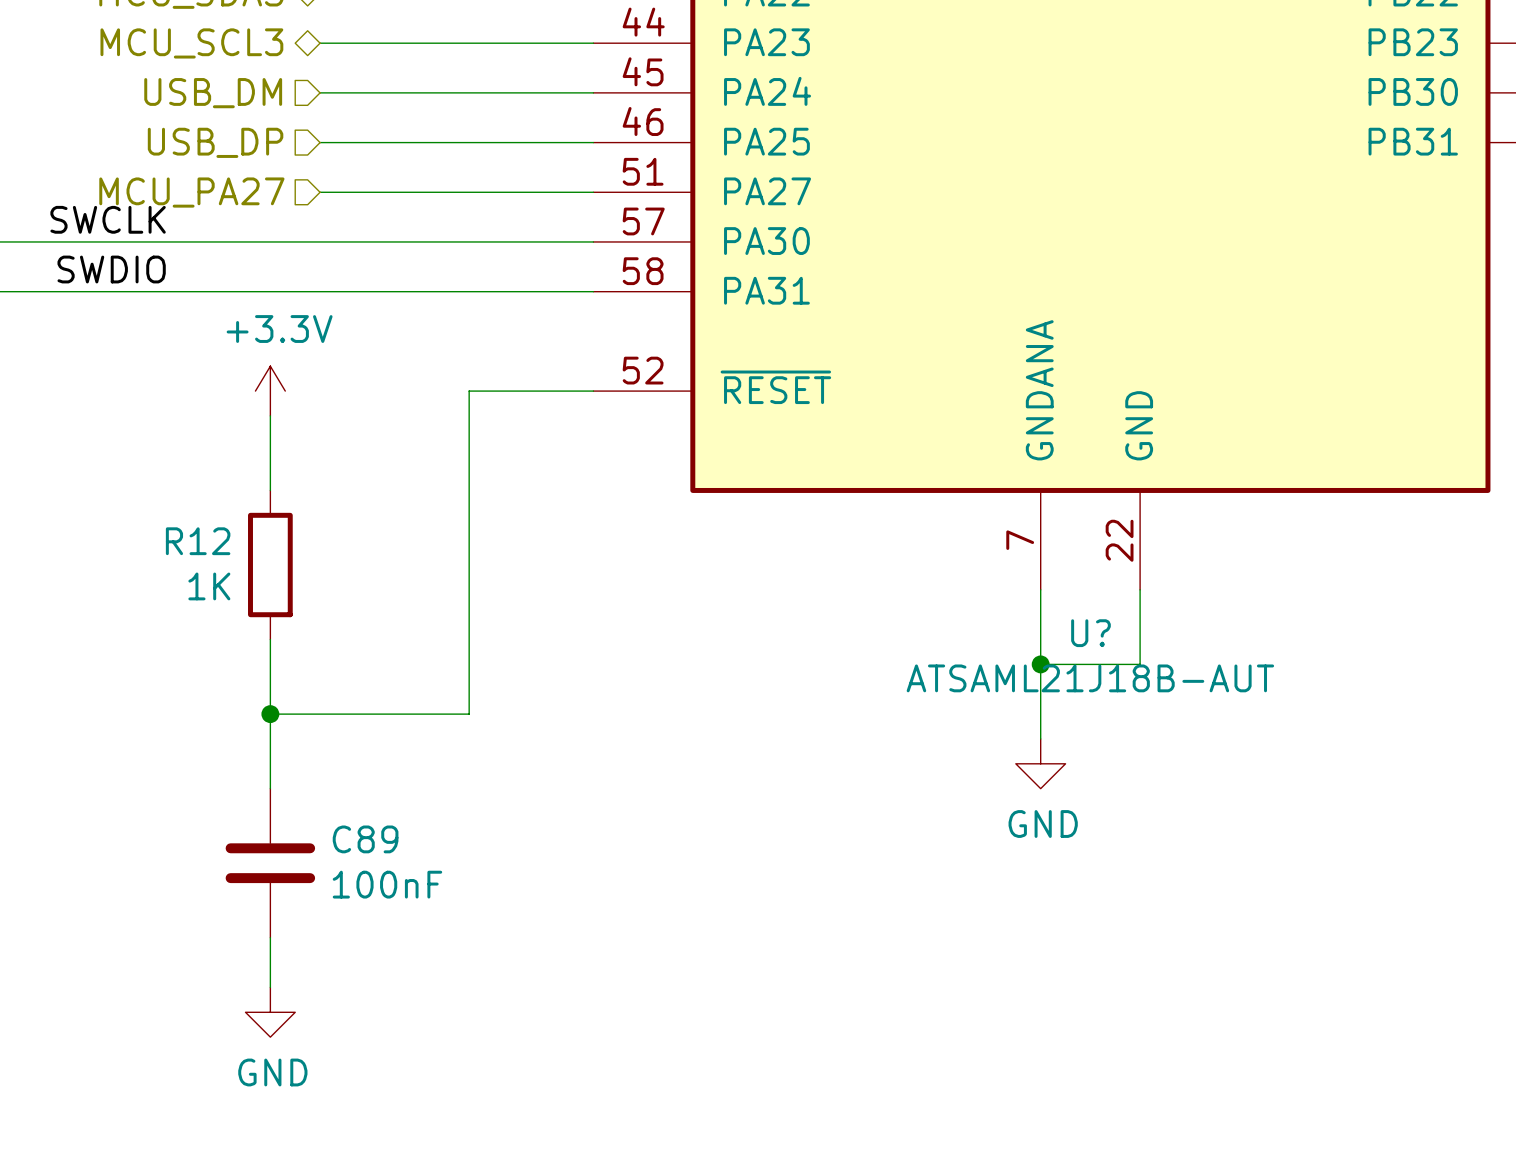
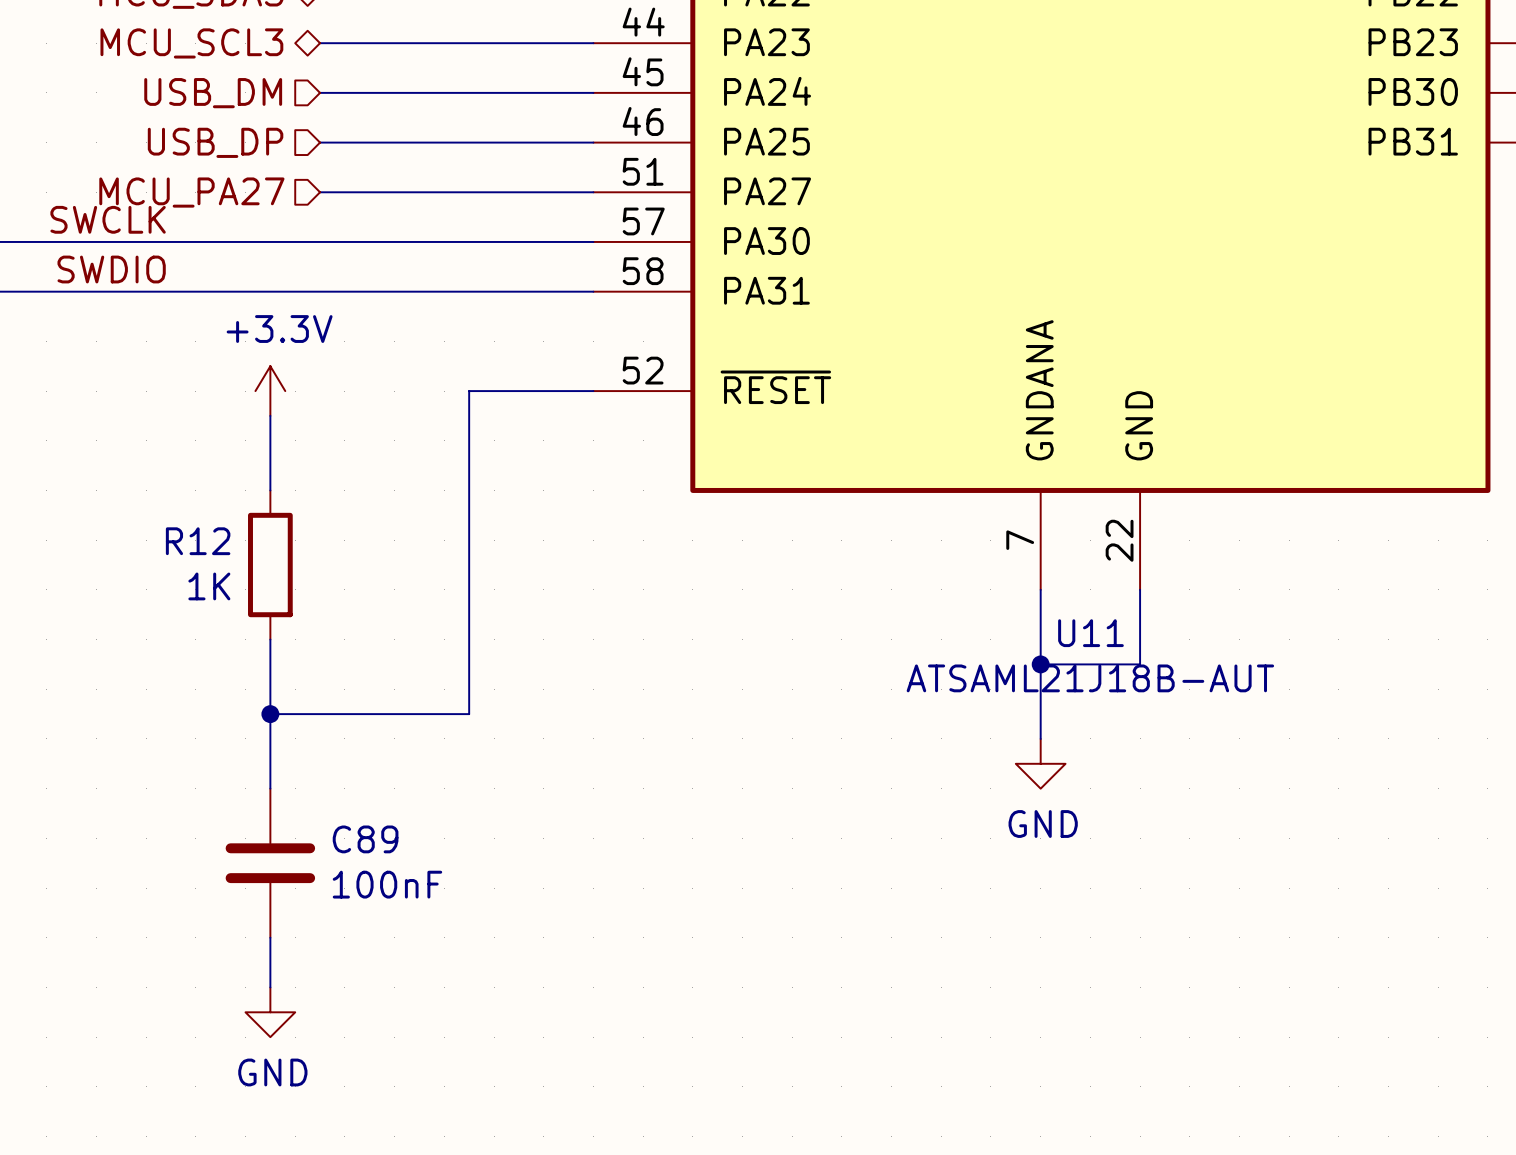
U? name: U? (1090, 633) -> U11 (1090, 633)

